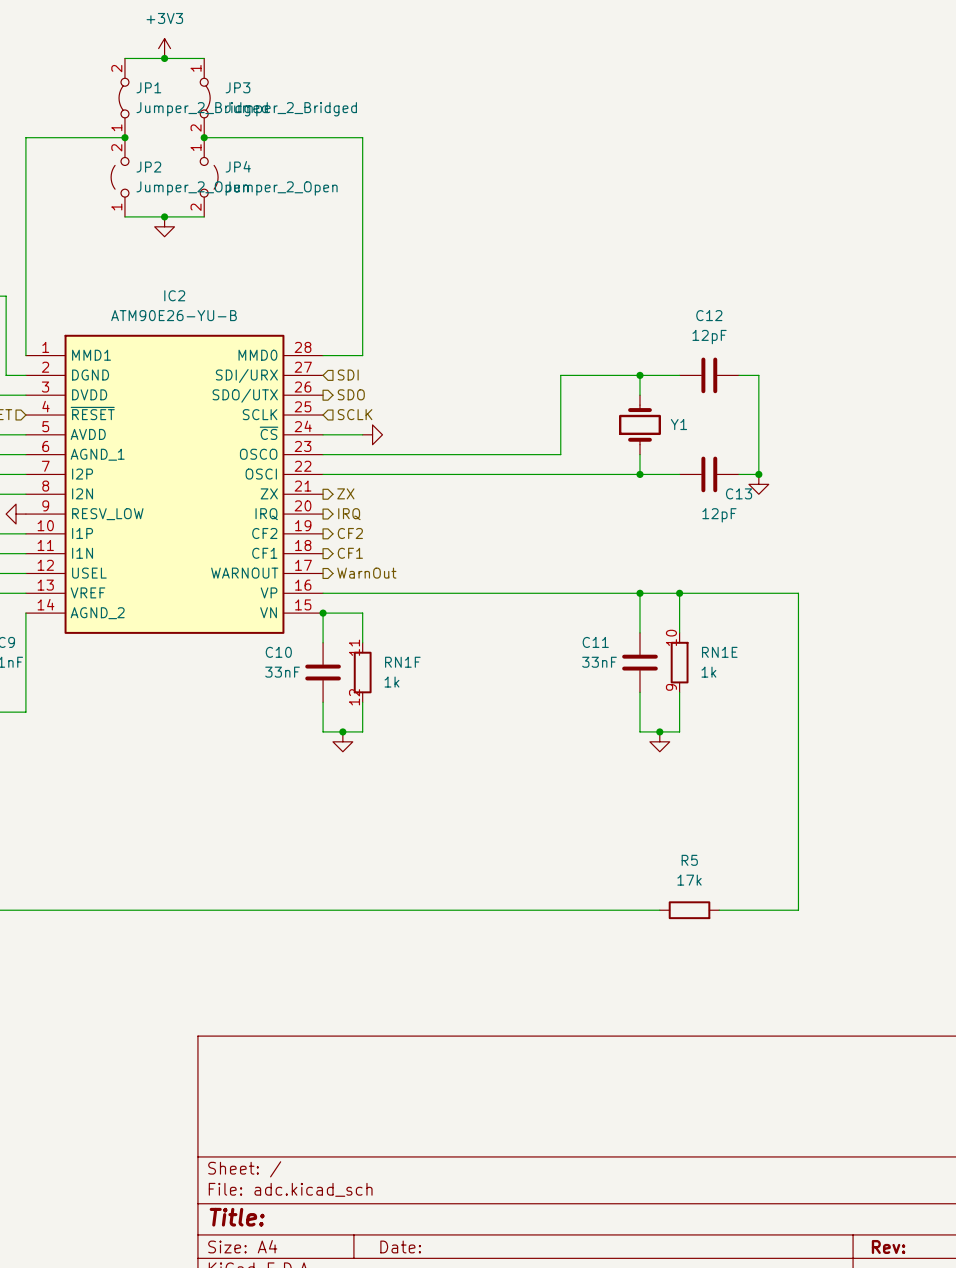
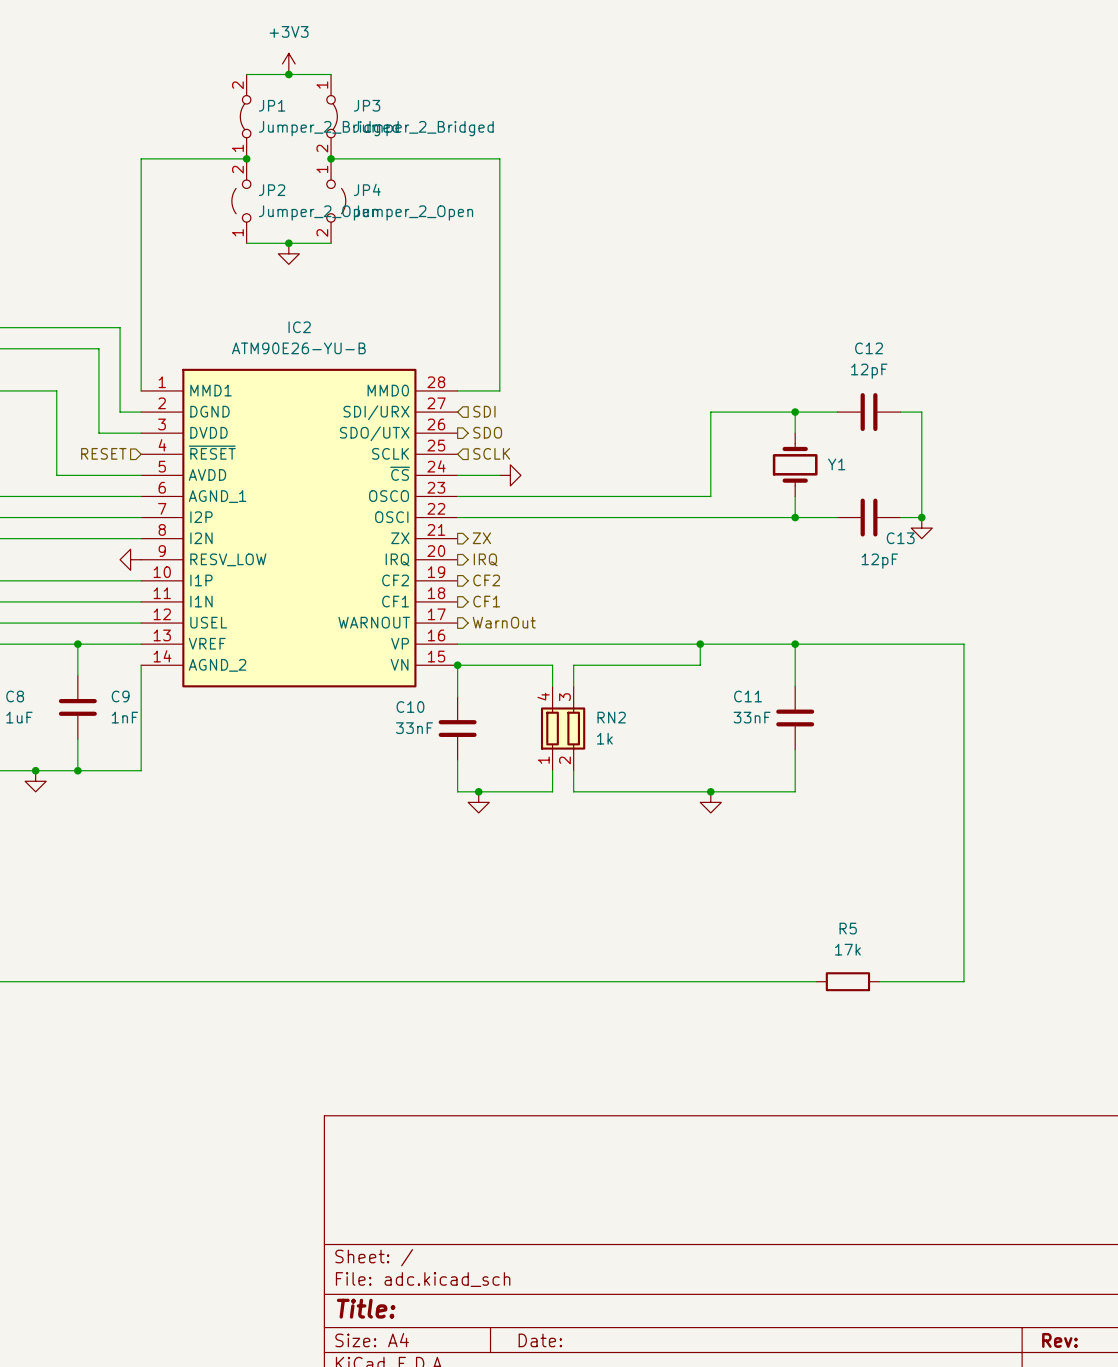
wire: none -> (700, 644) (700, 665) (573, 665) (573, 686)
junction: none -> (700, 644)
wire: (679, 593) (679, 632) -> none
junction: (679, 593) -> none
wire: (362, 613) (362, 642) -> (499, 665) (552, 665) (552, 686)
RN1E: 1k (679, 662) -> none
RN1F: 1k (362, 672) -> none
RN2: none -> 1k (563, 728)
wire: (679, 692) (679, 731) (639, 731) -> (573, 770) (573, 791) (795, 791)
wire: (362, 702) (362, 731) -> (552, 770) (552, 791) (499, 791)
junction: none -> (710, 791)
junction: (659, 731) -> none
power symbol position: (659, 741) -> (710, 802)

